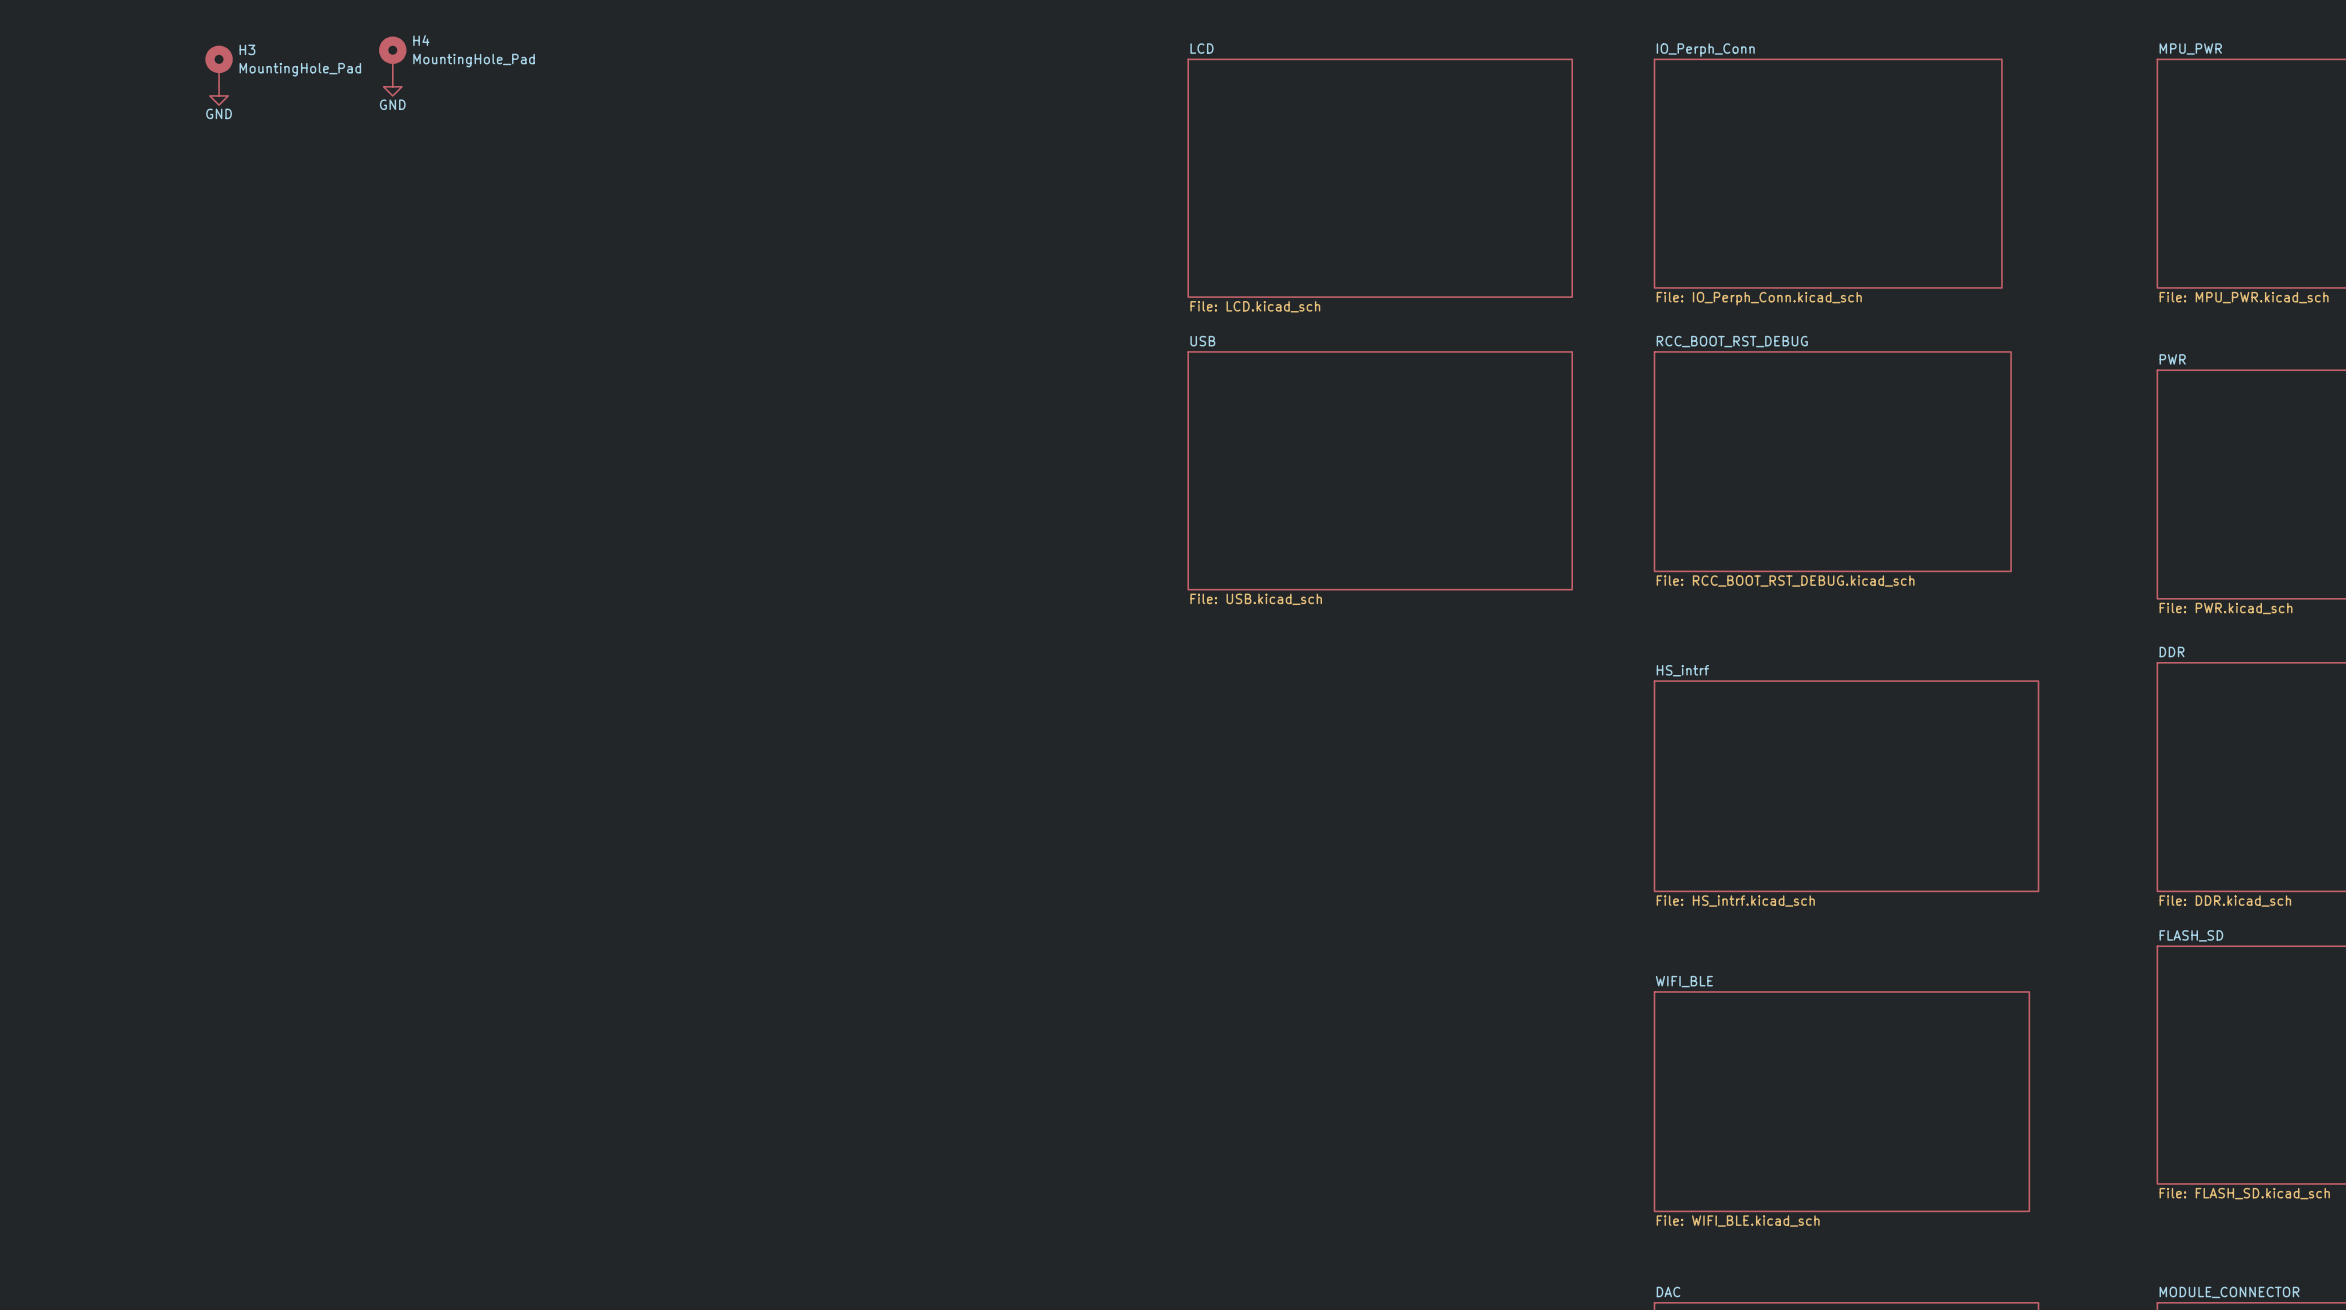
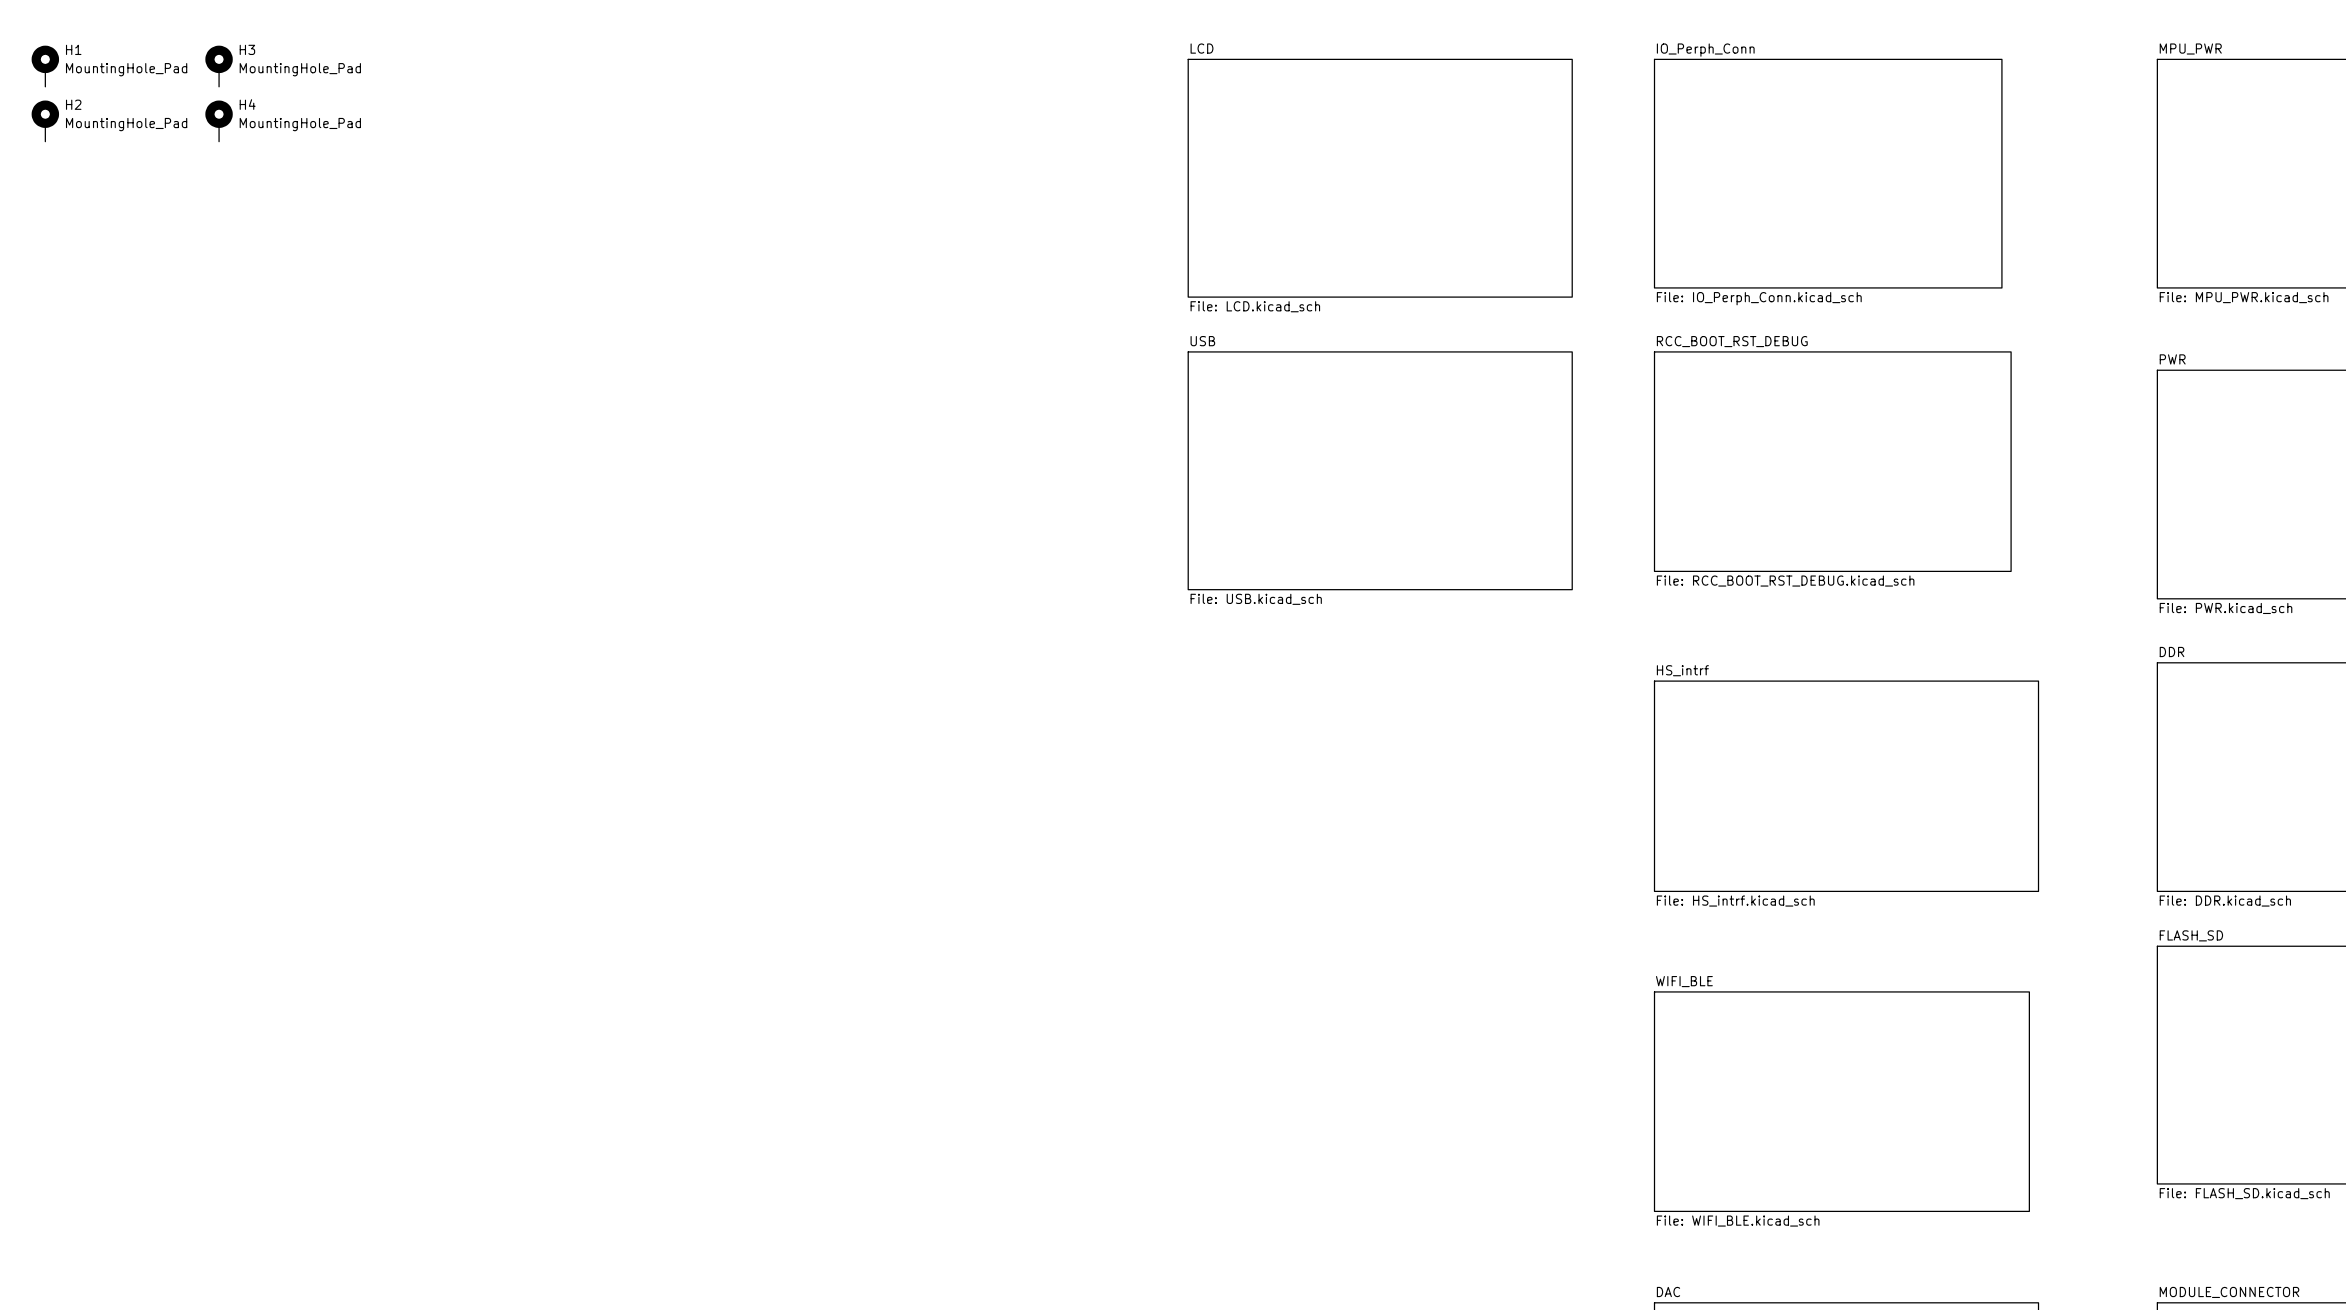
H4 position: (392, 57) -> (219, 121)
H1: none -> MountingHole_Pad (45, 66)
power symbol: GND (392, 86) -> none
power symbol: GND (219, 95) -> none
H2: none -> MountingHole_Pad (45, 121)

